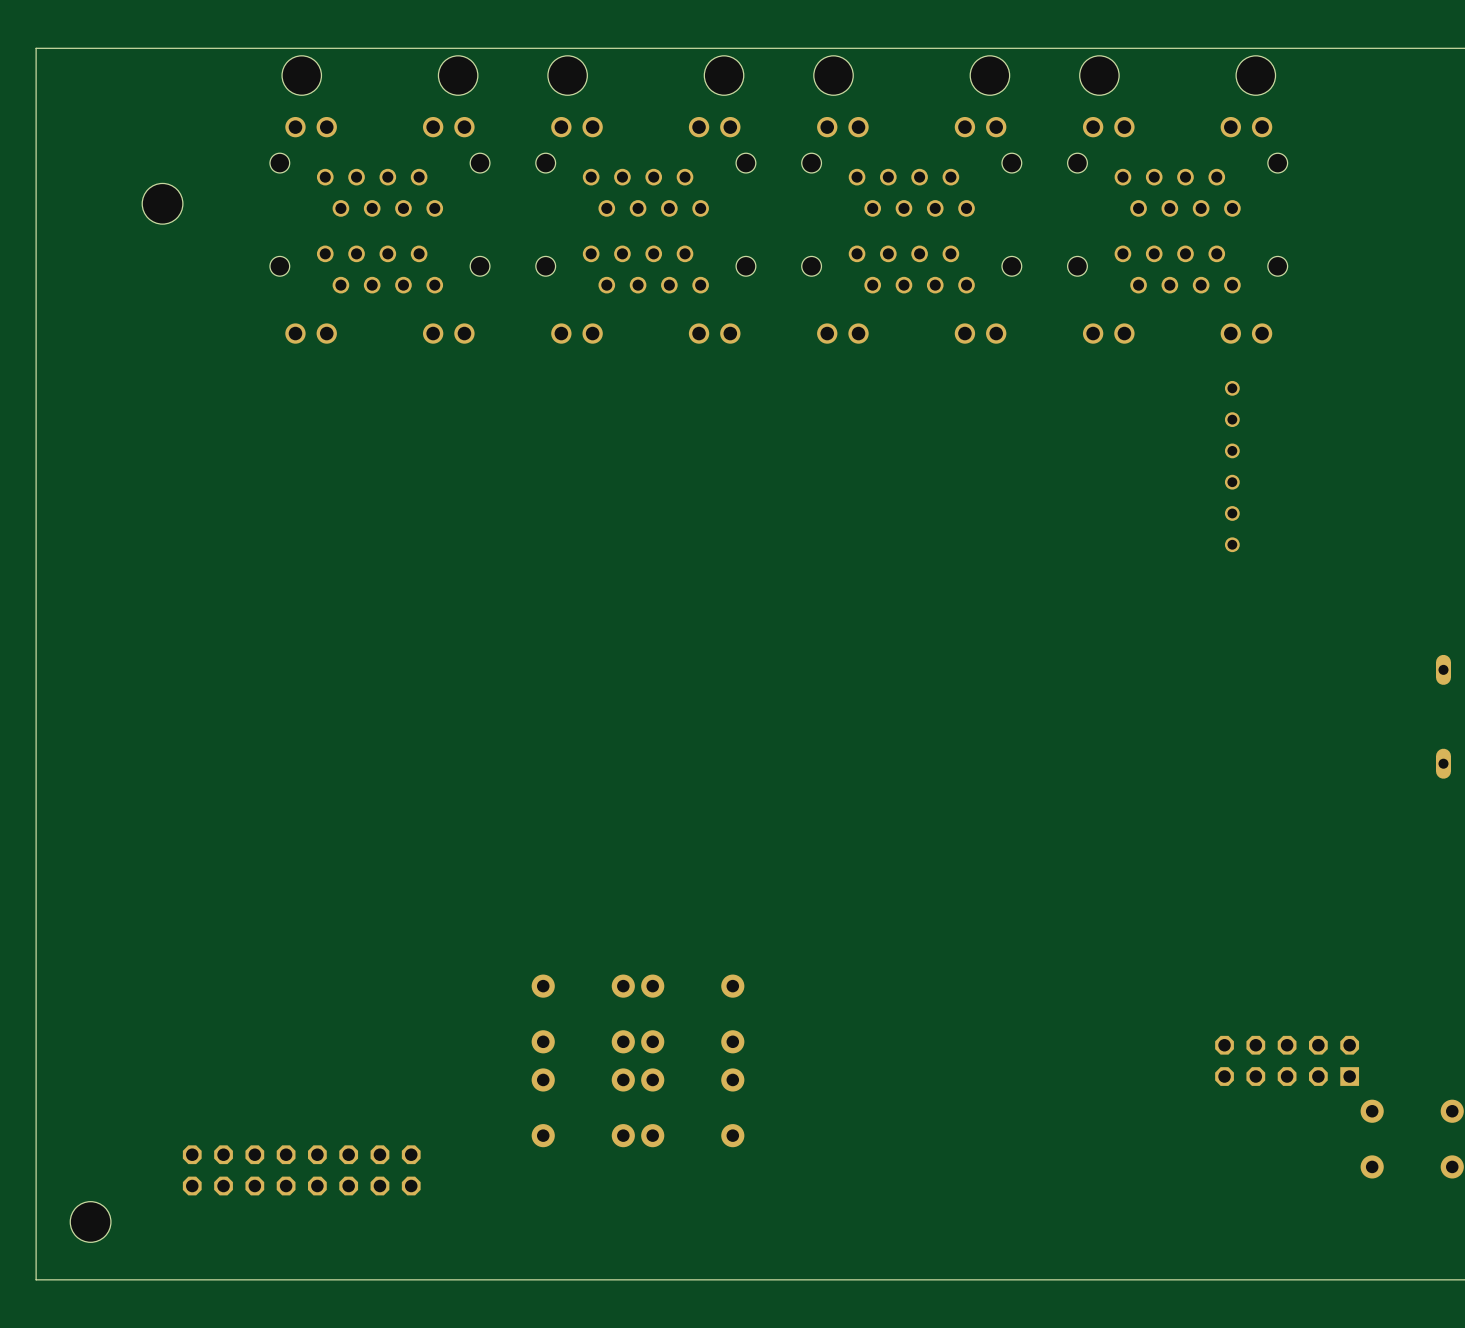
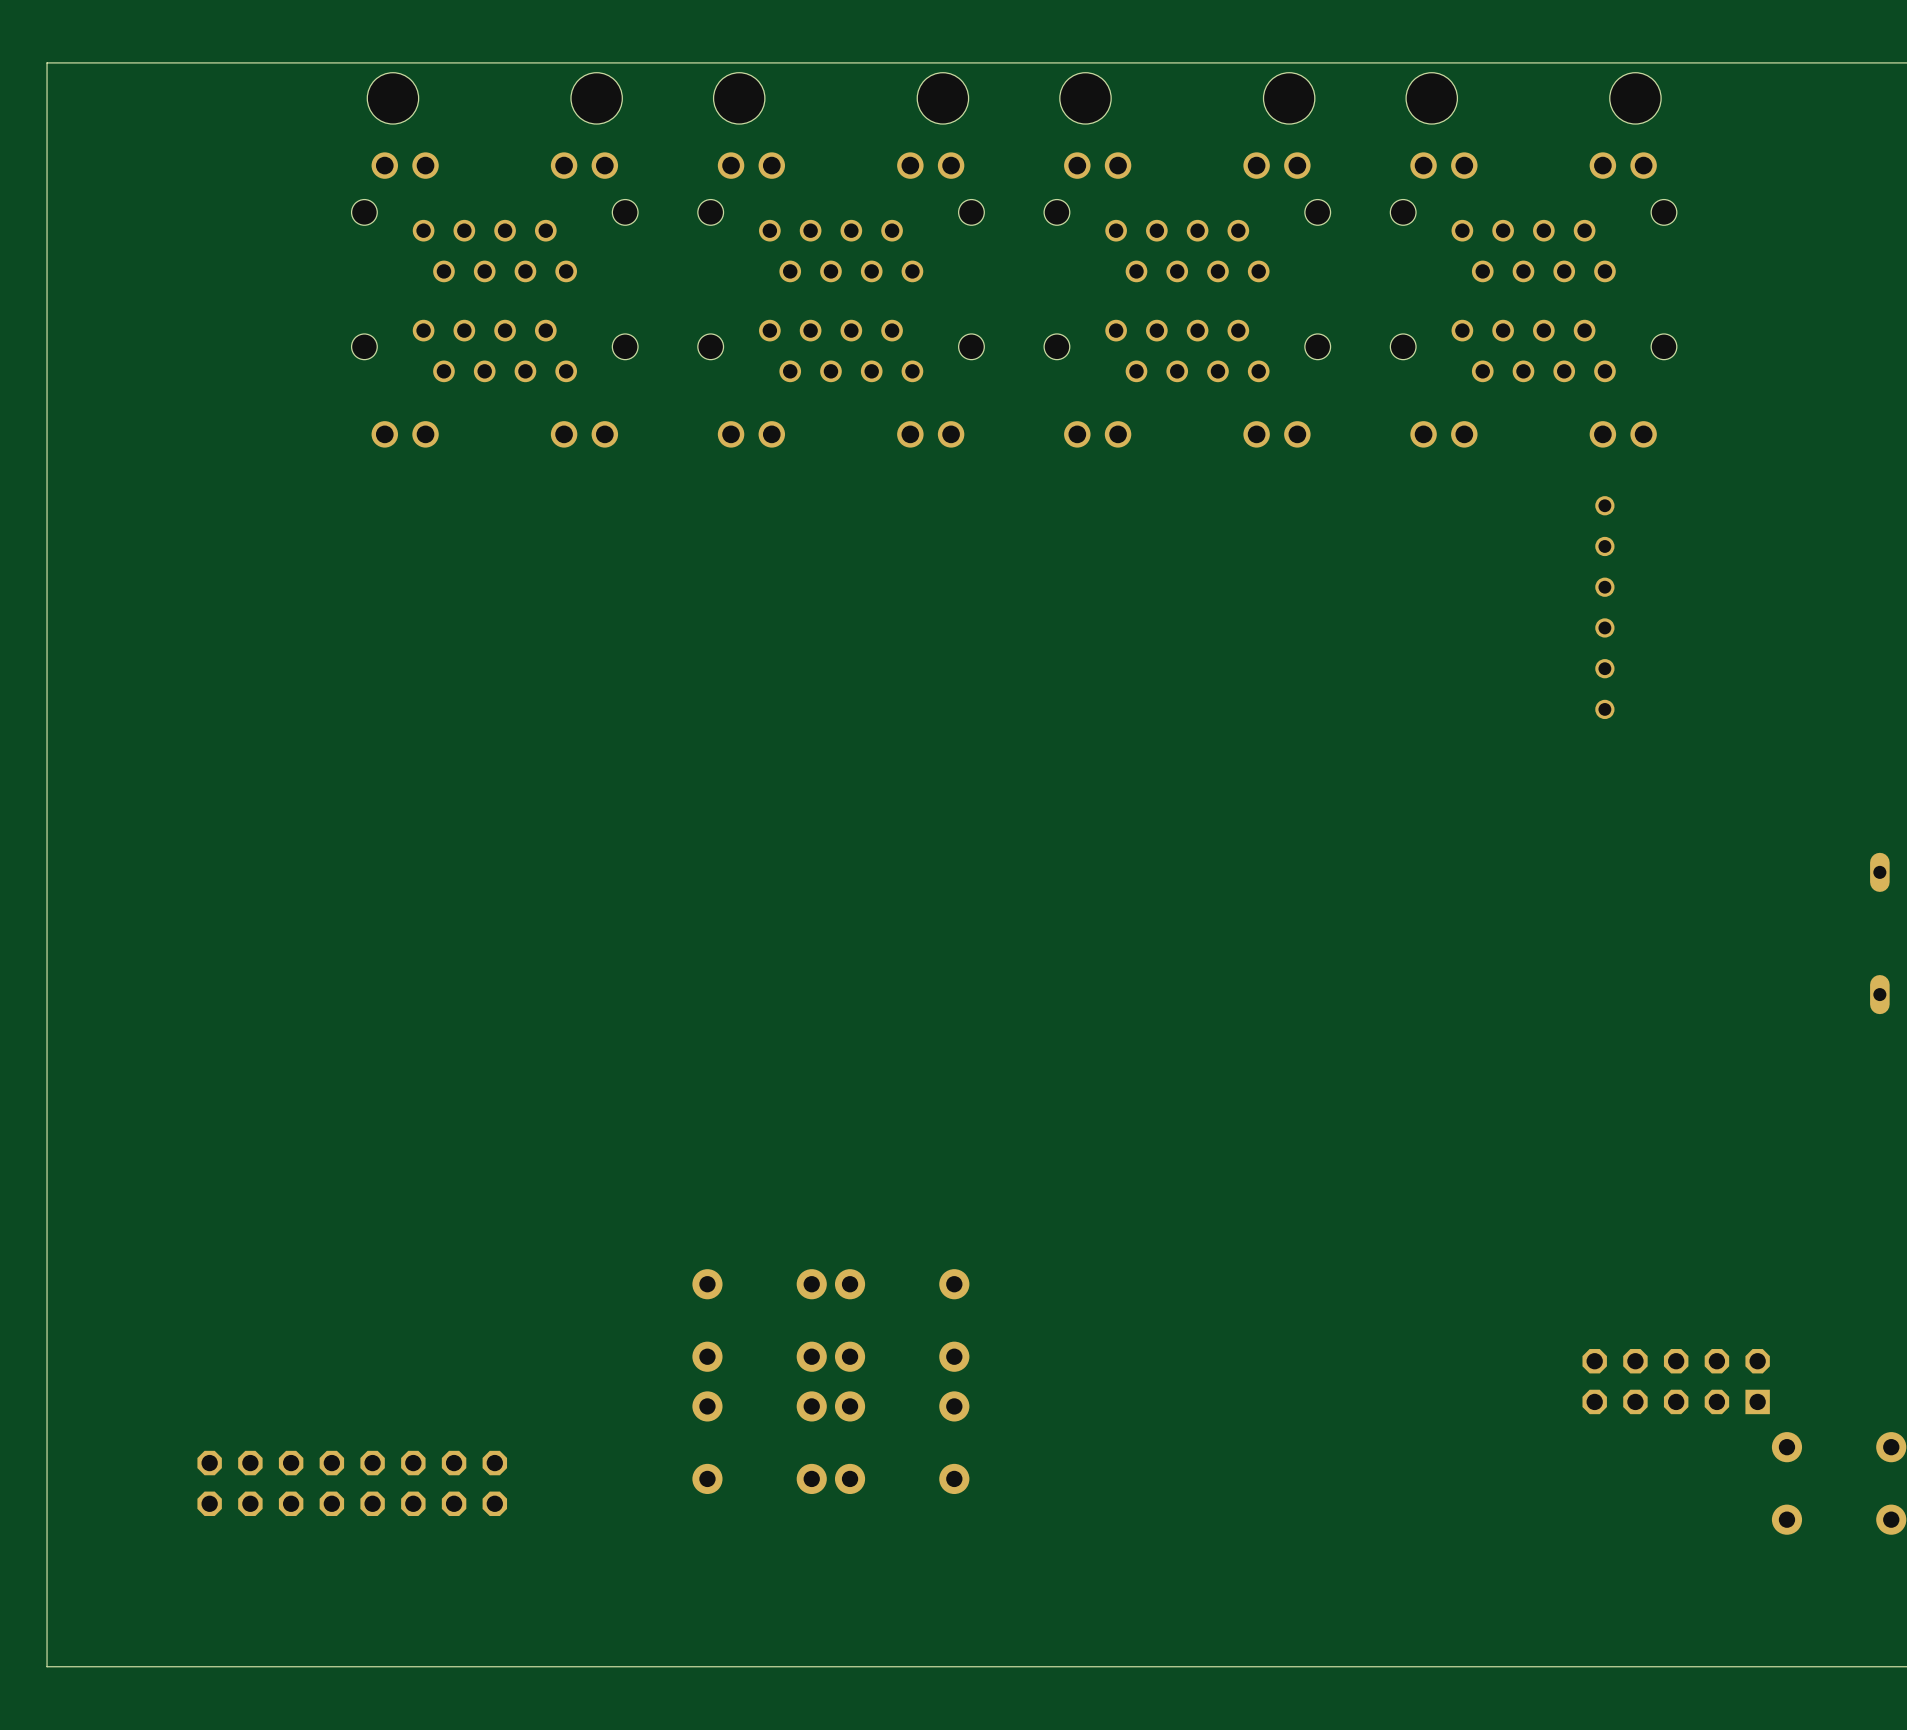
part: (162, 203) -> none
part position: (301, 1170) -> (352, 1483)
part: (90, 1221) -> none

